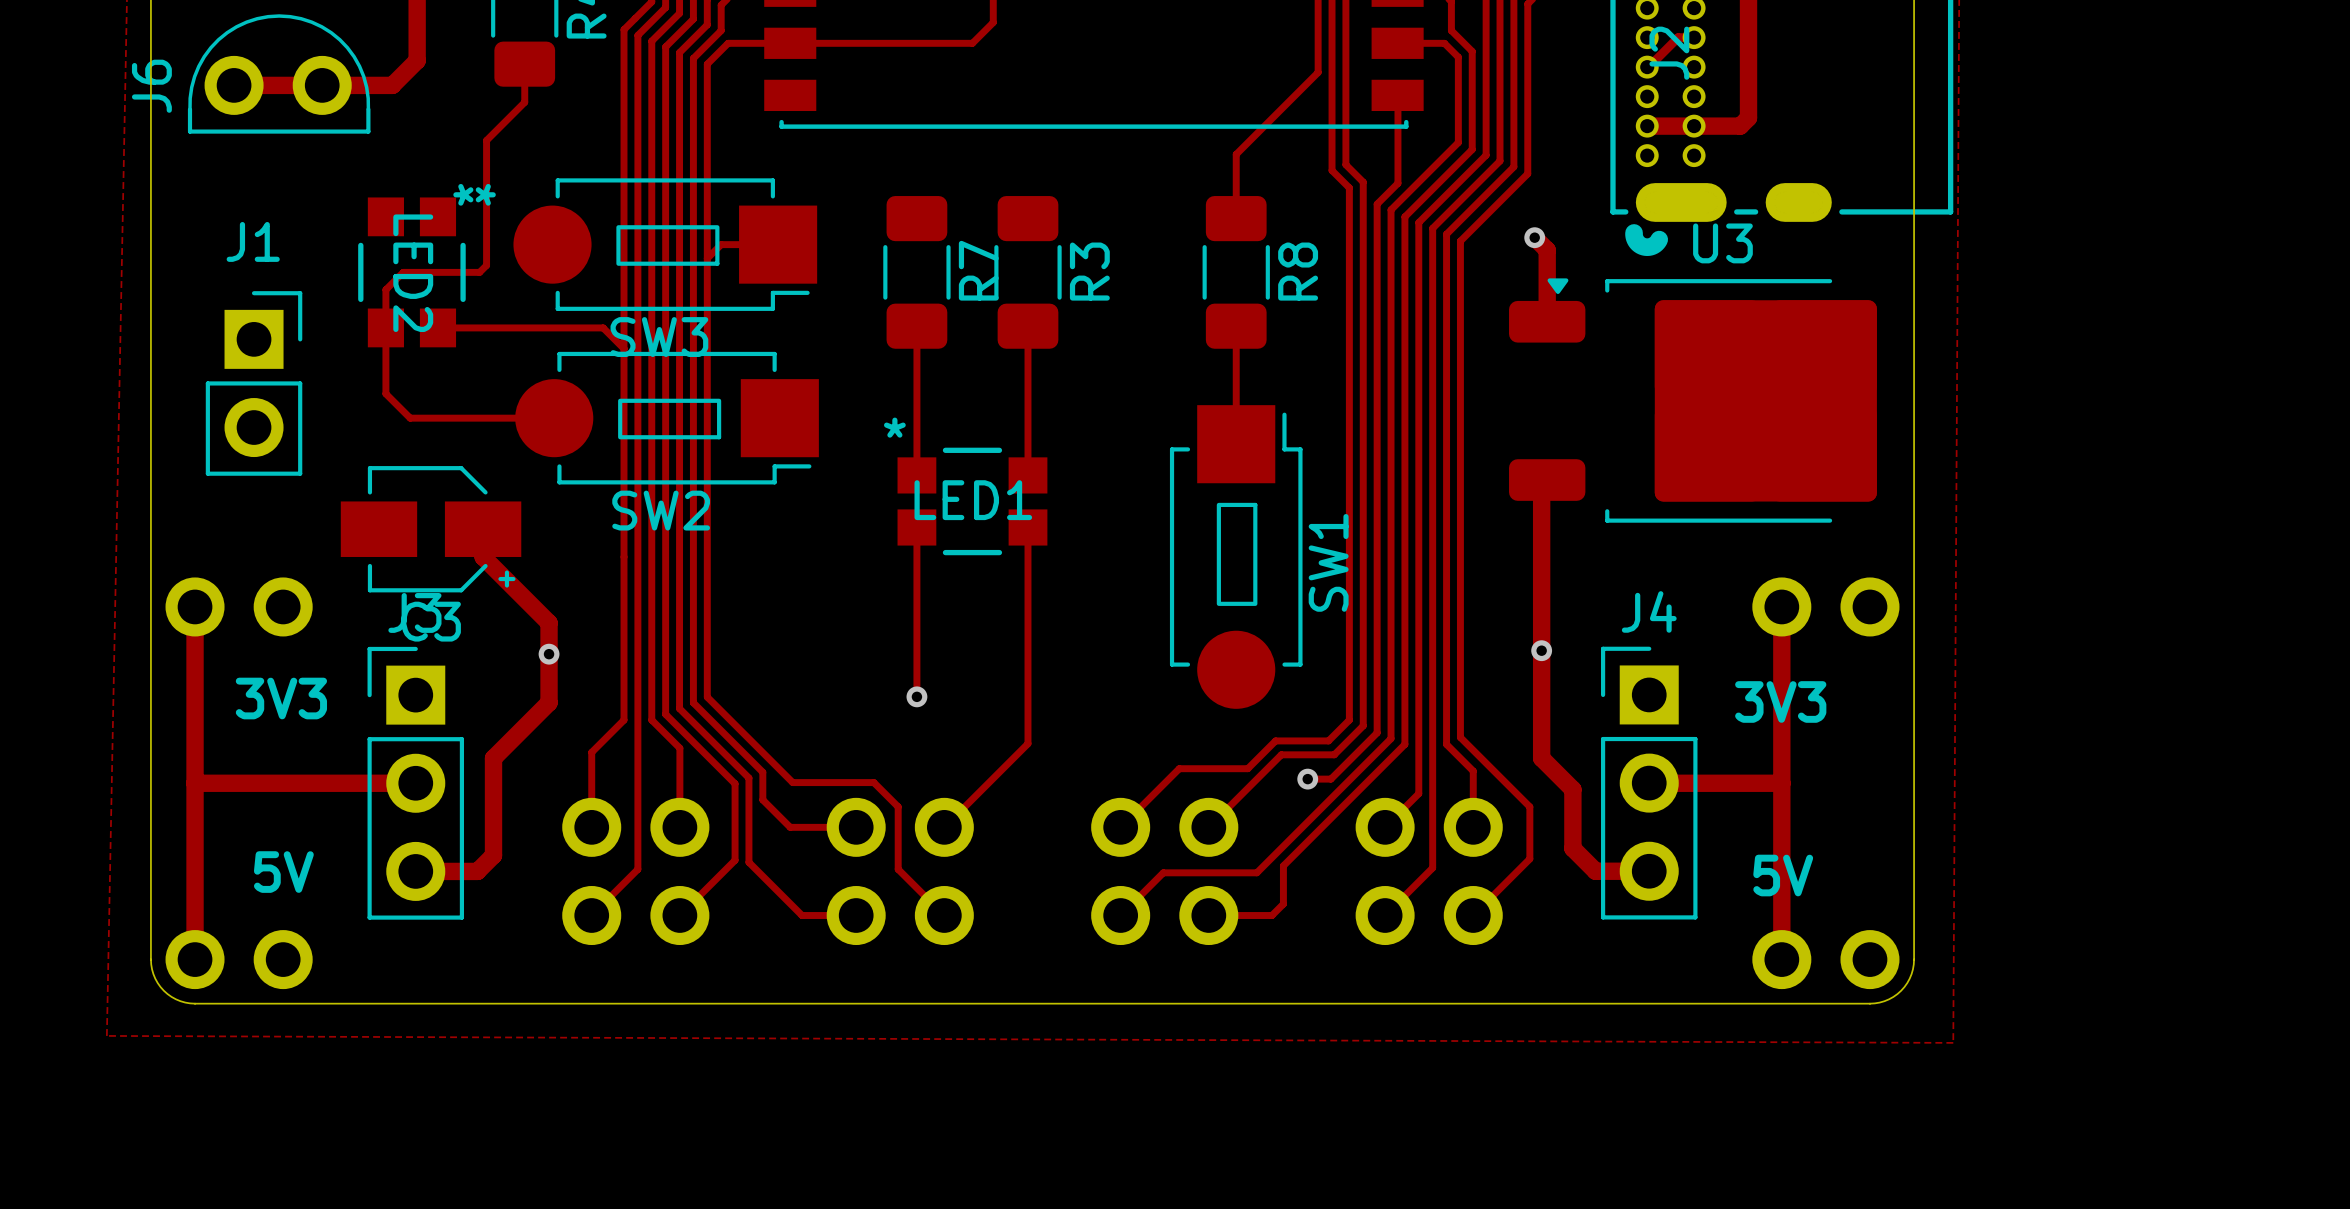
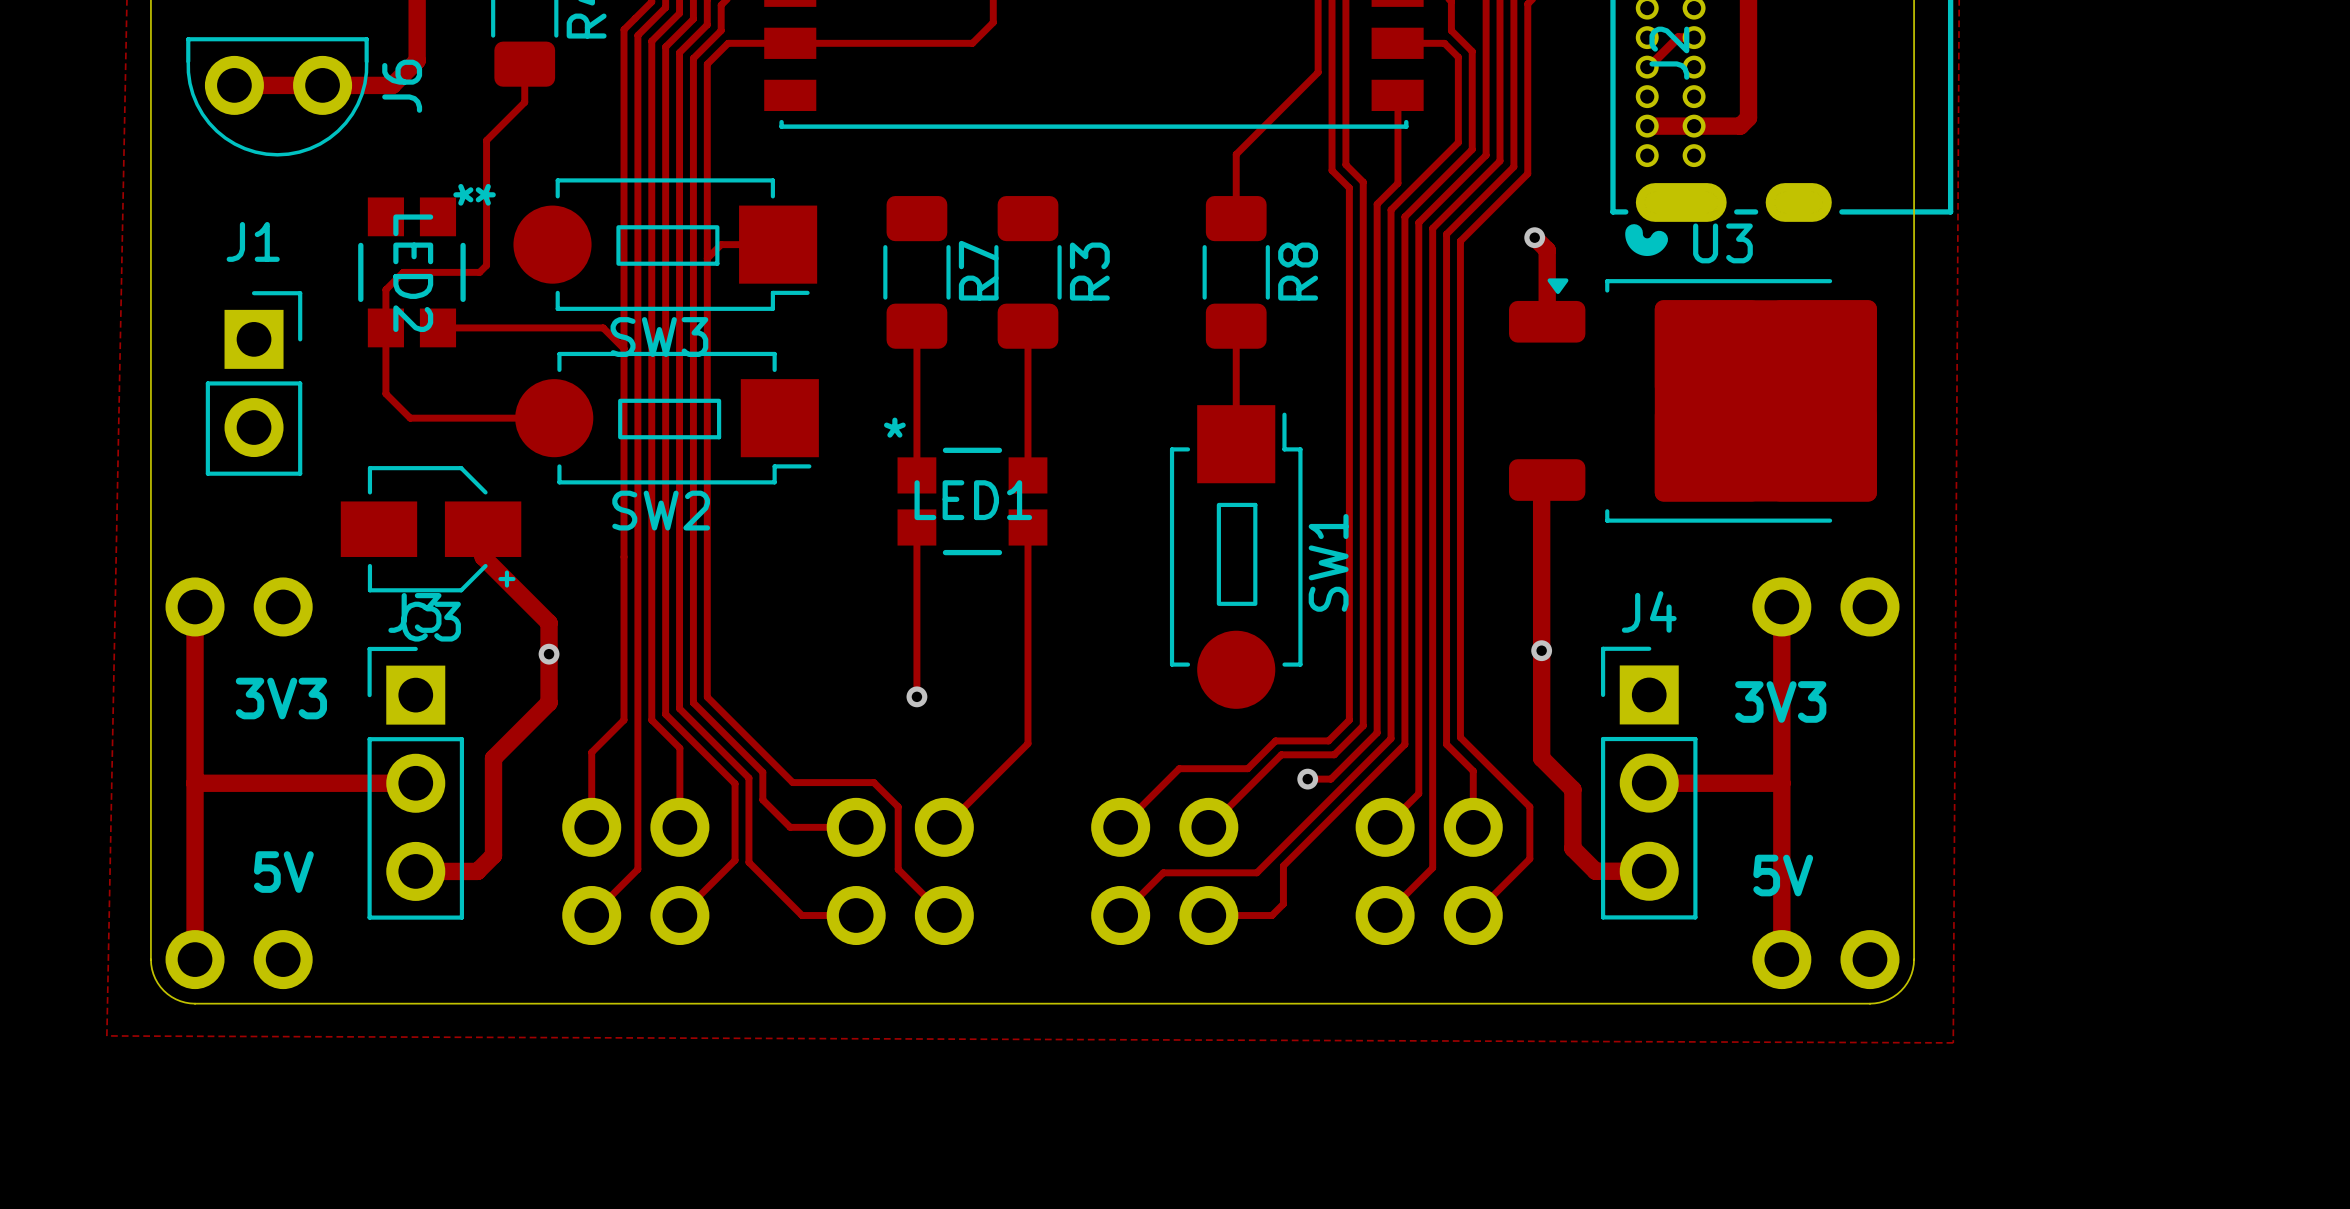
J6 rotation: 0° (279, 73) -> 180° (277, 96)

